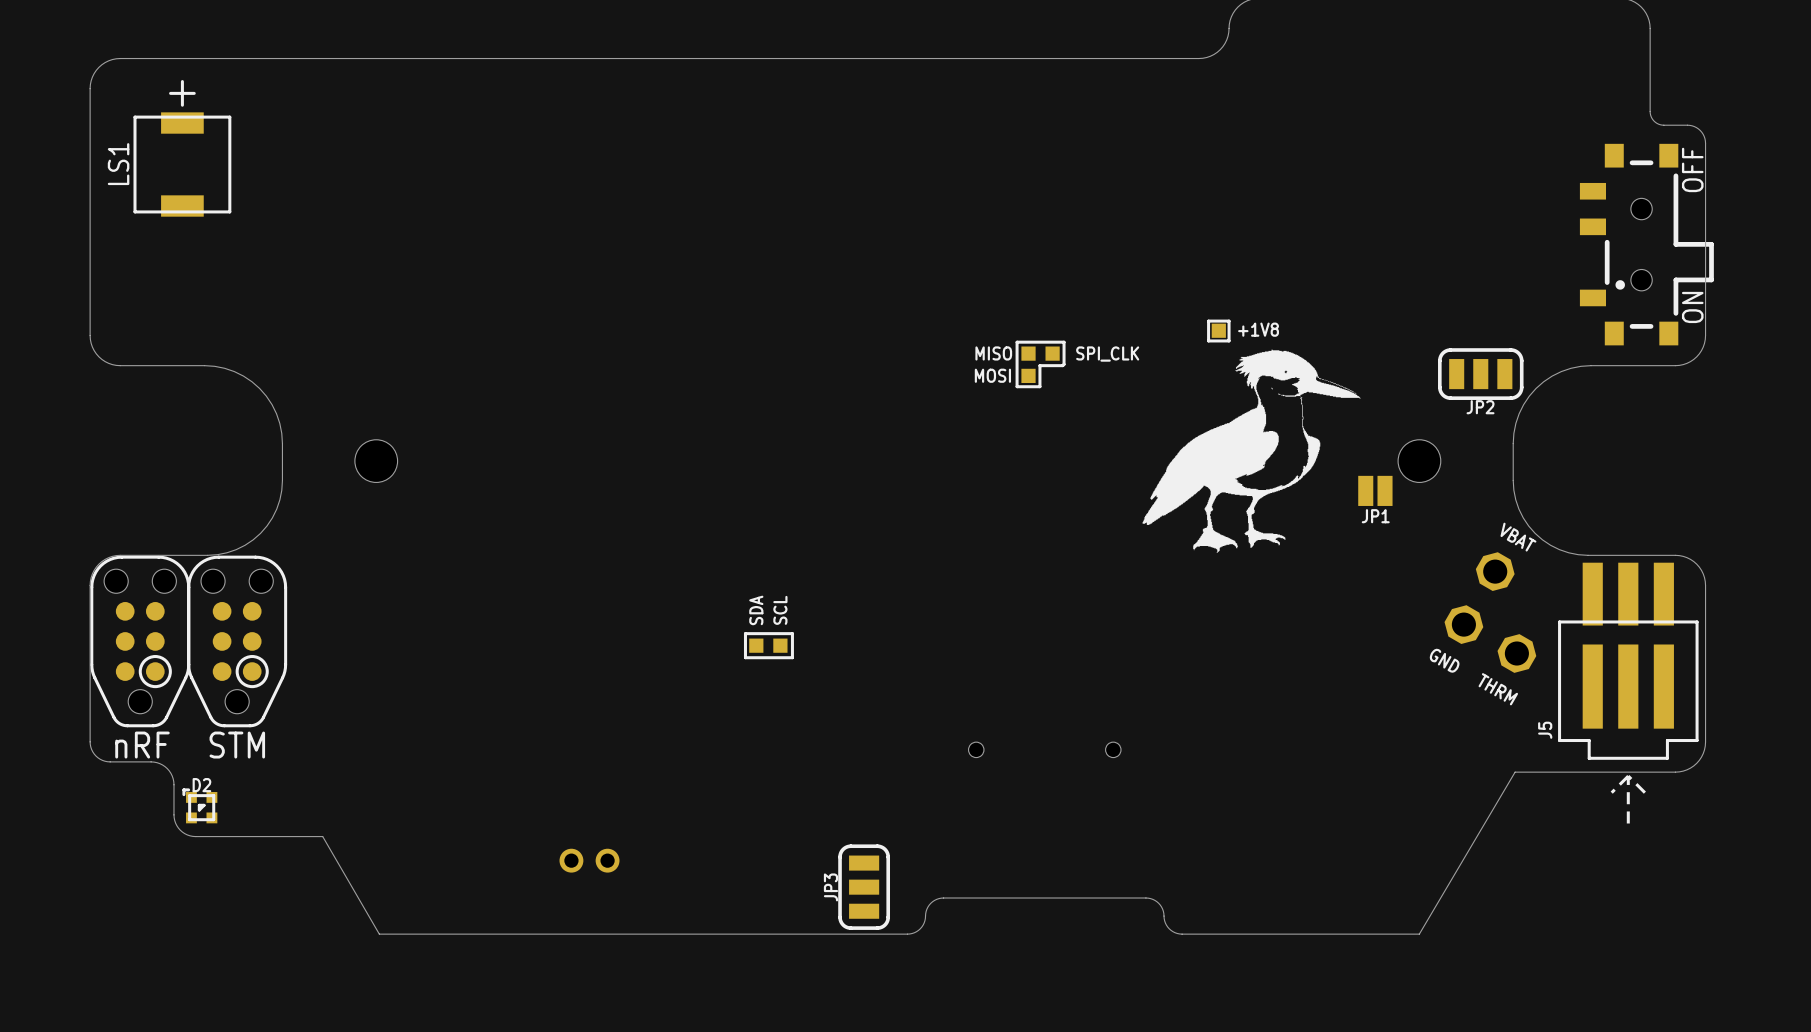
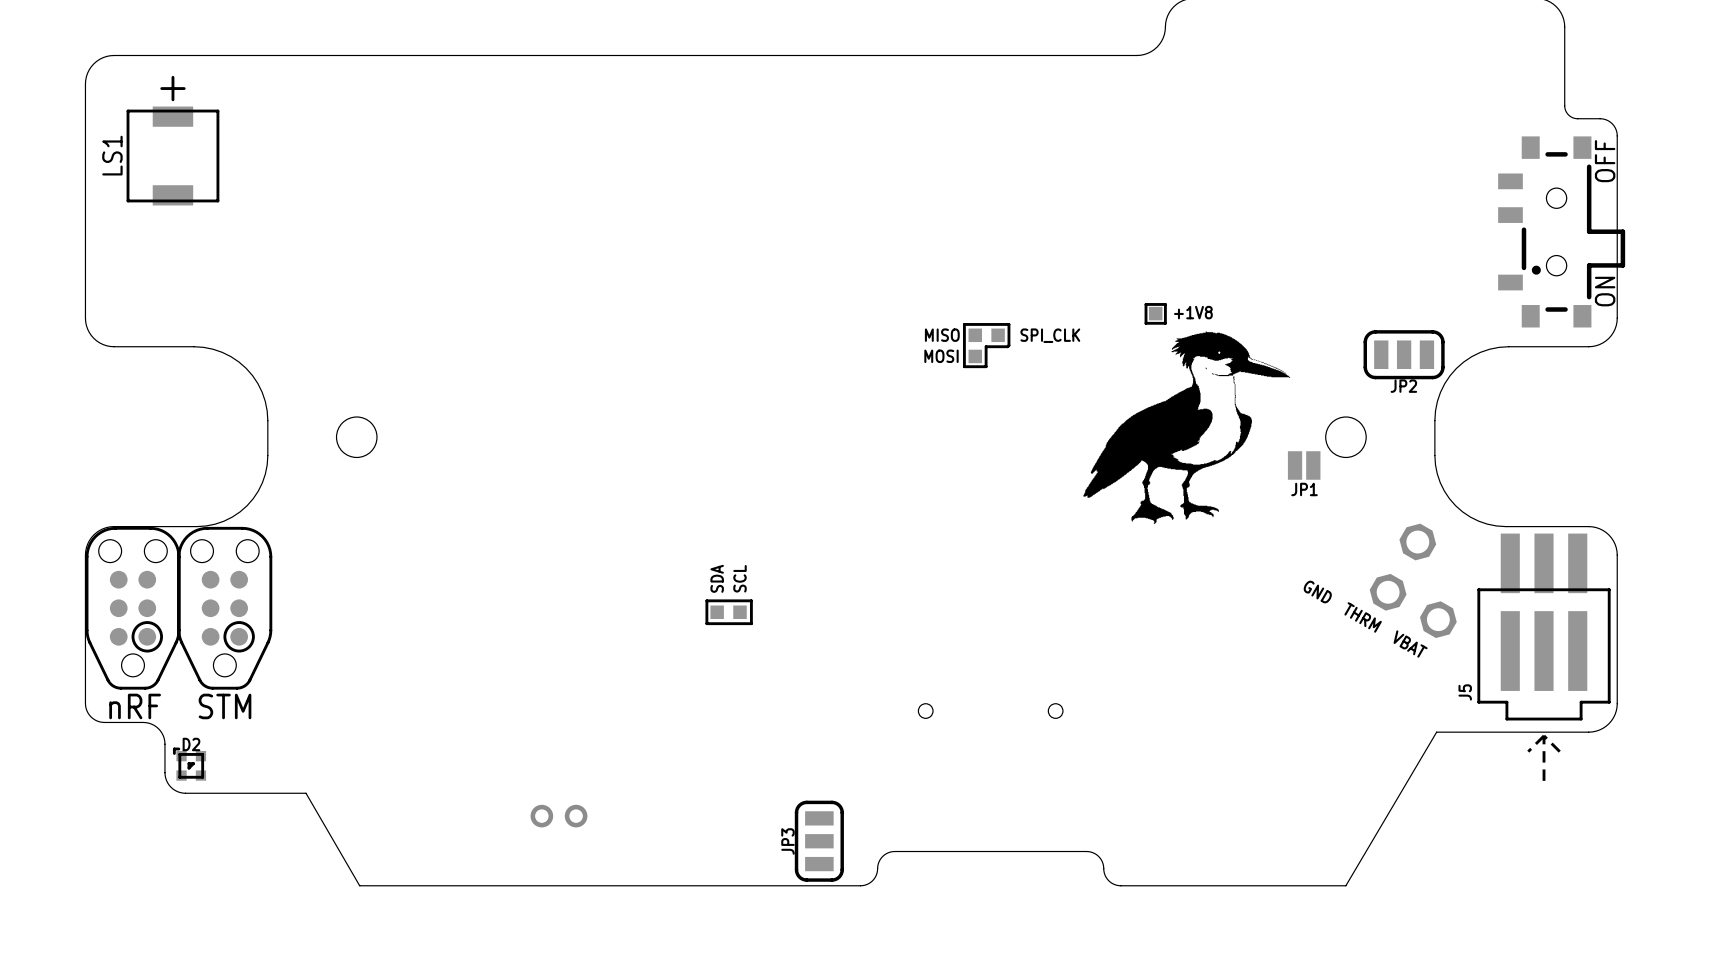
text: VBAT (1518, 537) -> none
text: none -> GND THRM VBAT (1365, 619)
text: GND (1444, 660) -> none
text: THRM (1498, 689) -> none

